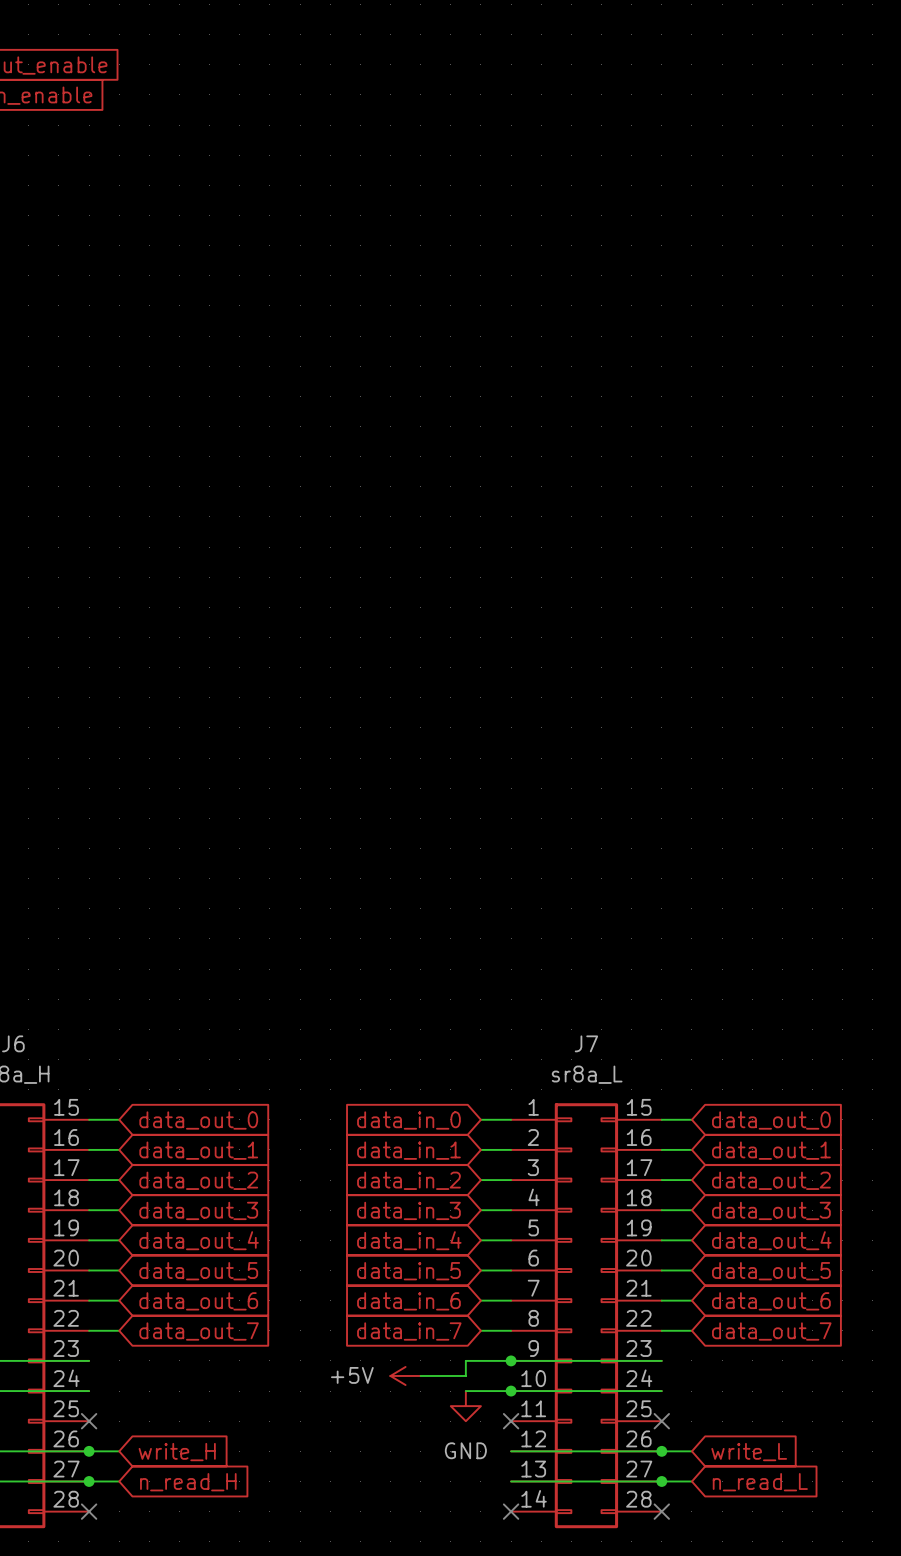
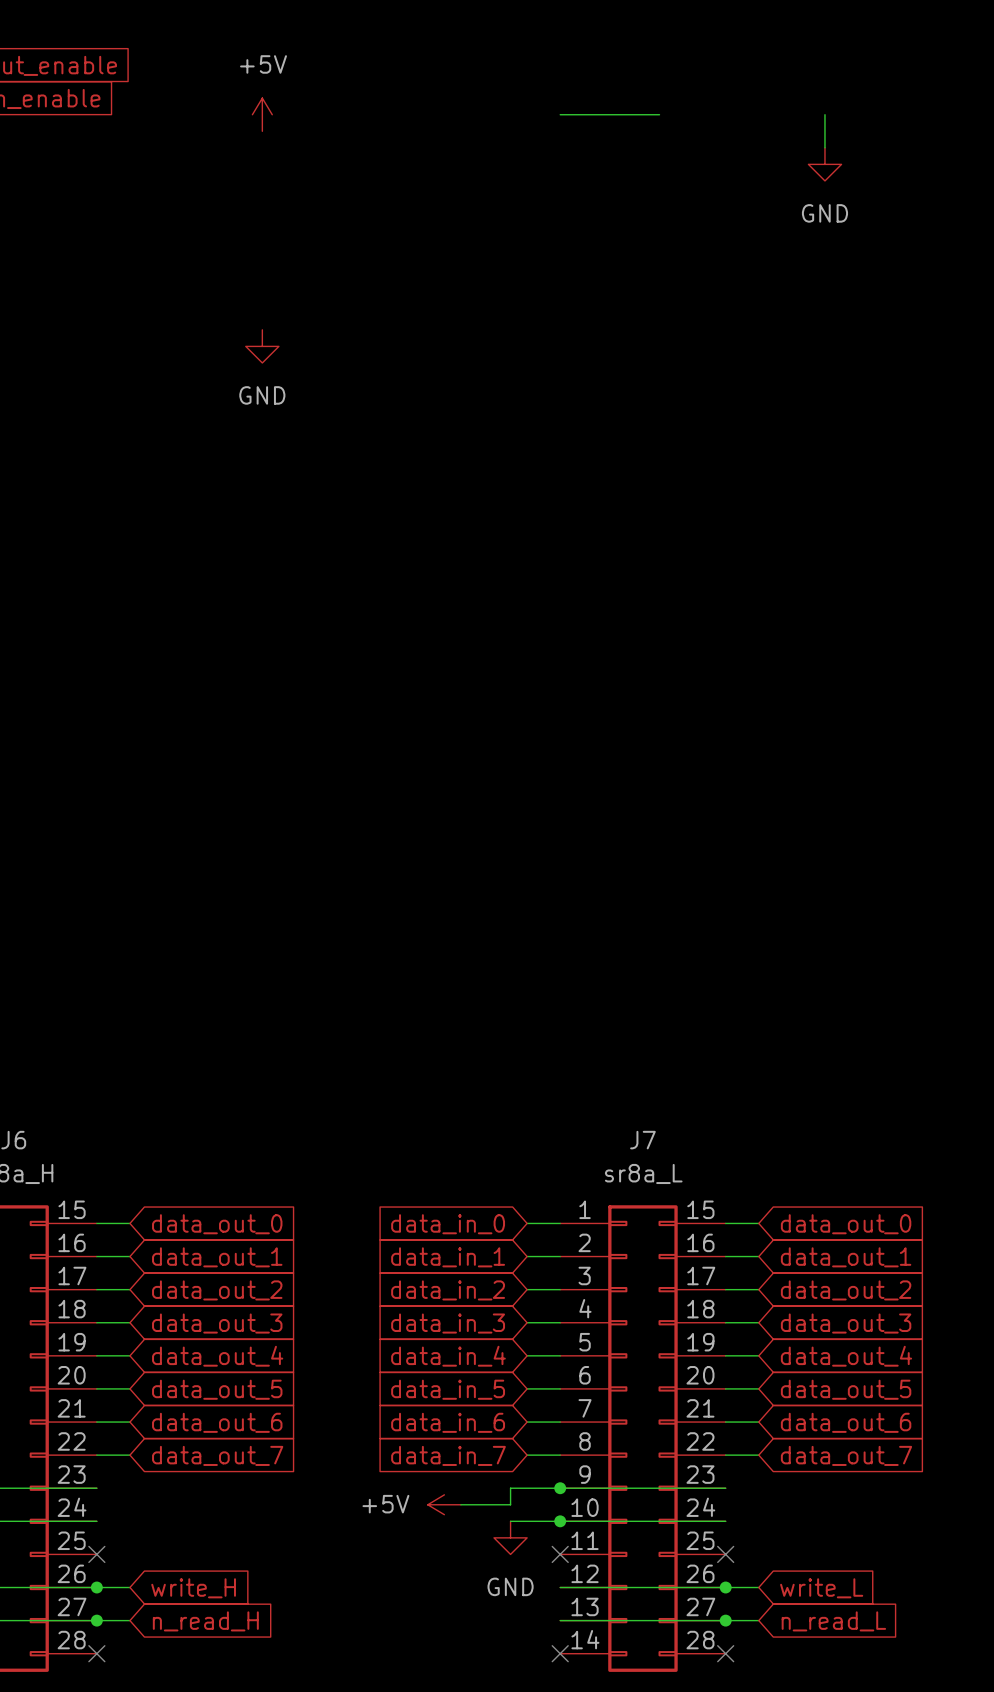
power symbol: none -> +5V (262, 114)
wire: none -> (560, 114) (659, 114)
wire: none -> (824, 114) (824, 147)
power symbol: none -> GND (824, 164)
power symbol: none -> GND (262, 346)

